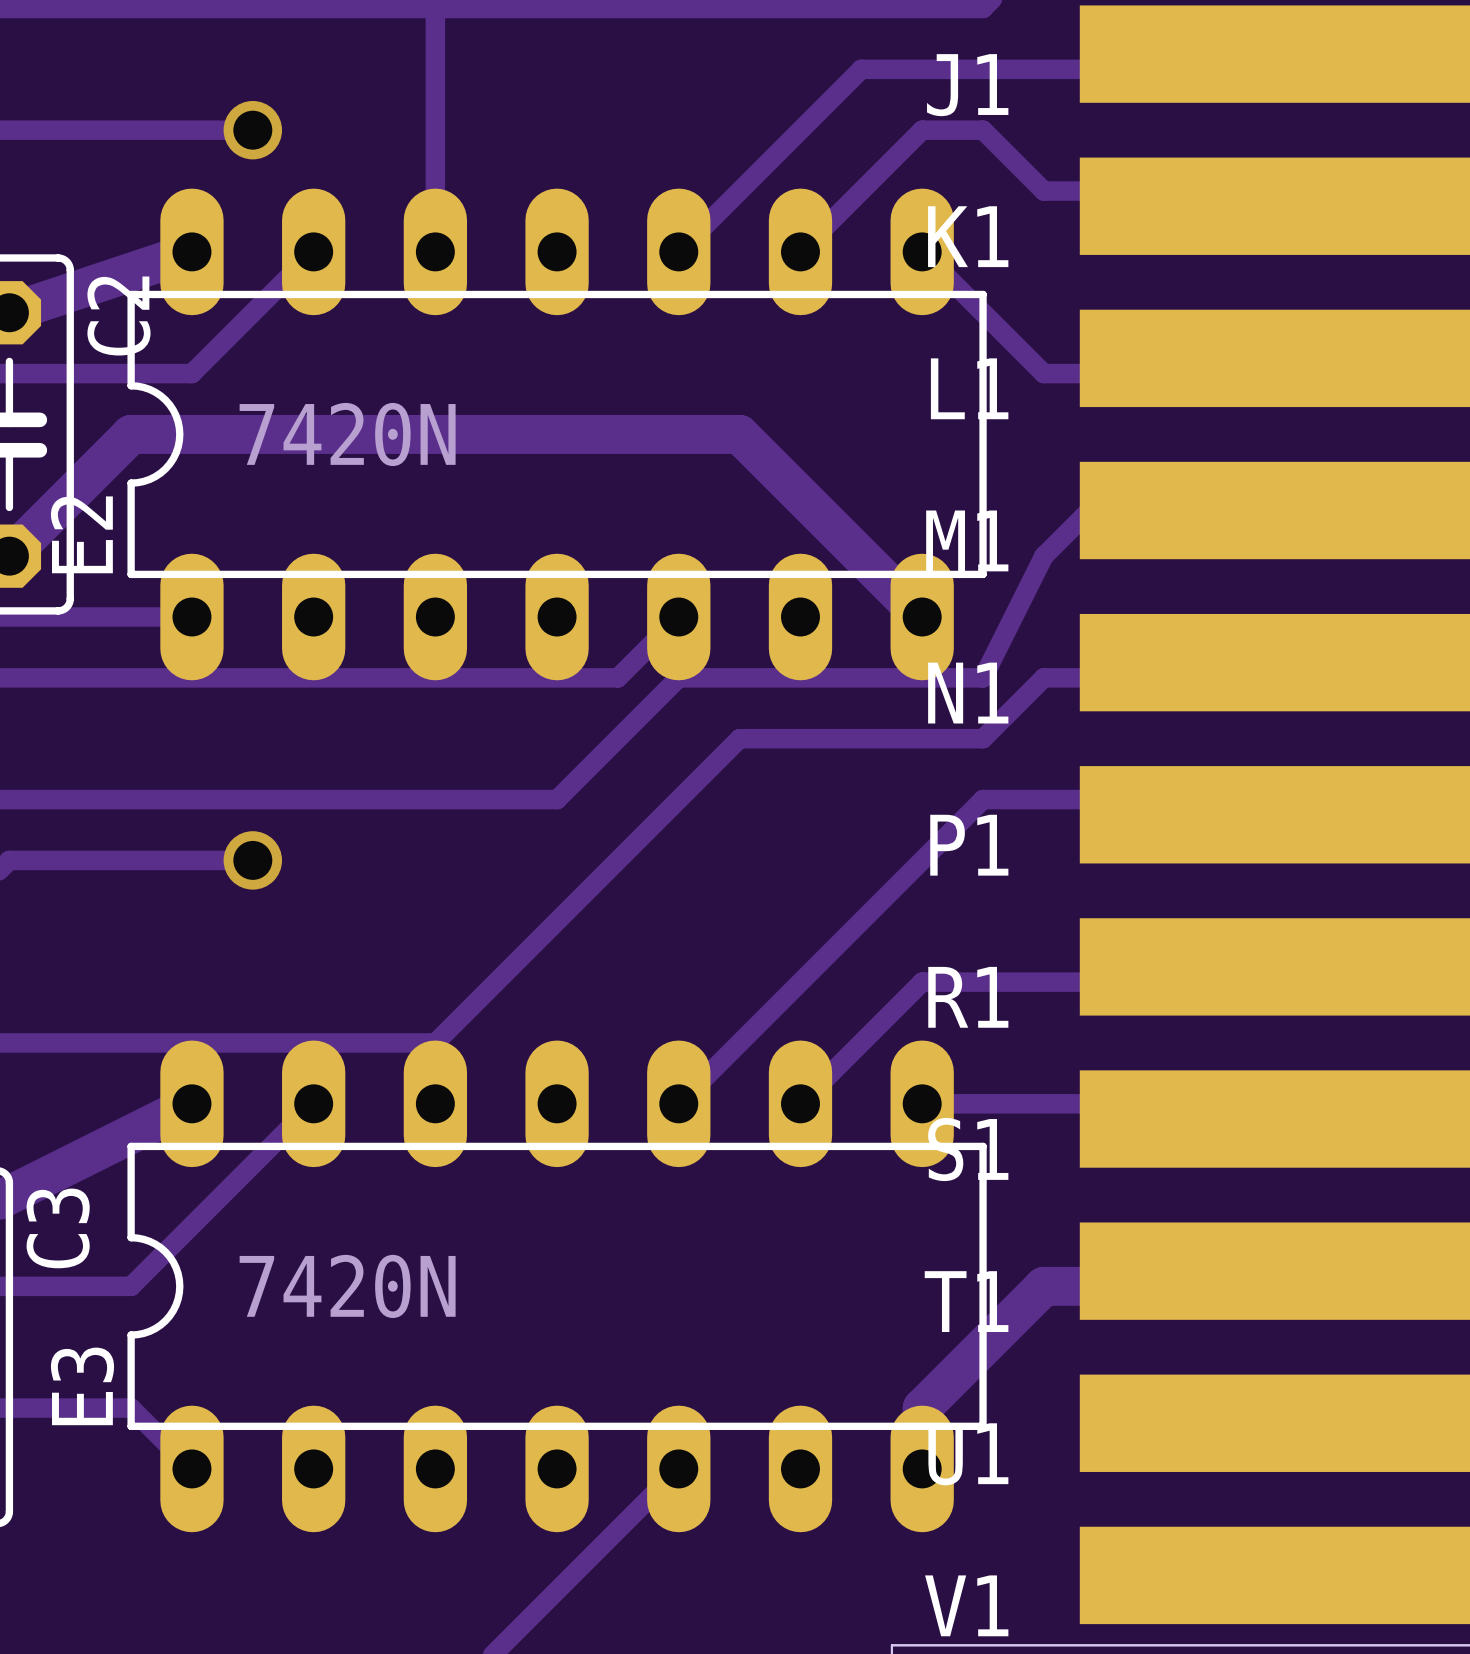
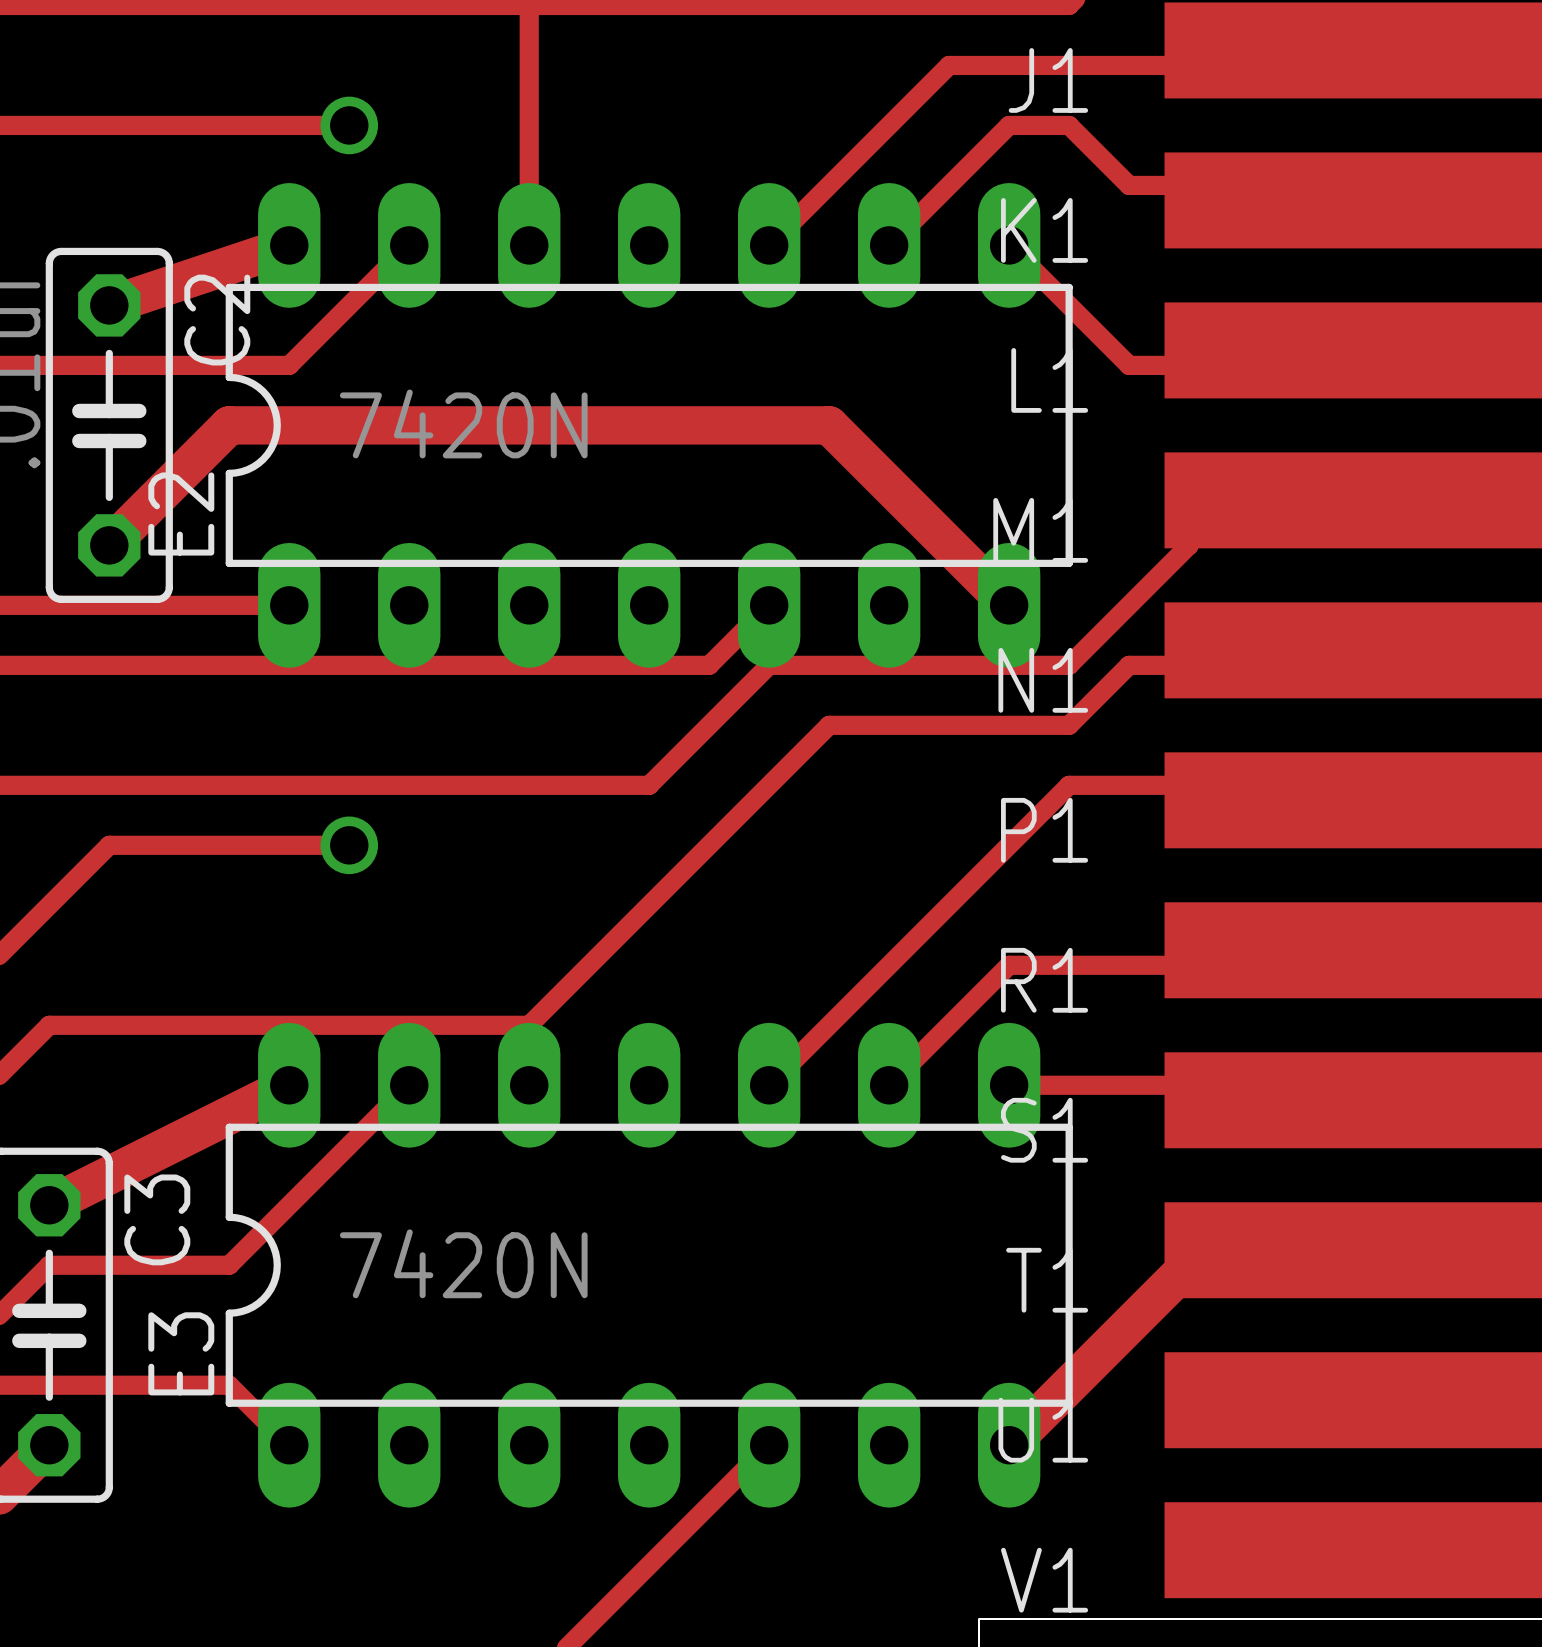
track: (1104, 495) (1043, 556) (983, 677) -> (1189, 485) (1189, 545) (1069, 665)
track: (1104, 1286) (1043, 1286) (922, 1408) (922, 1468) -> (1189, 1265) (1009, 1445)

